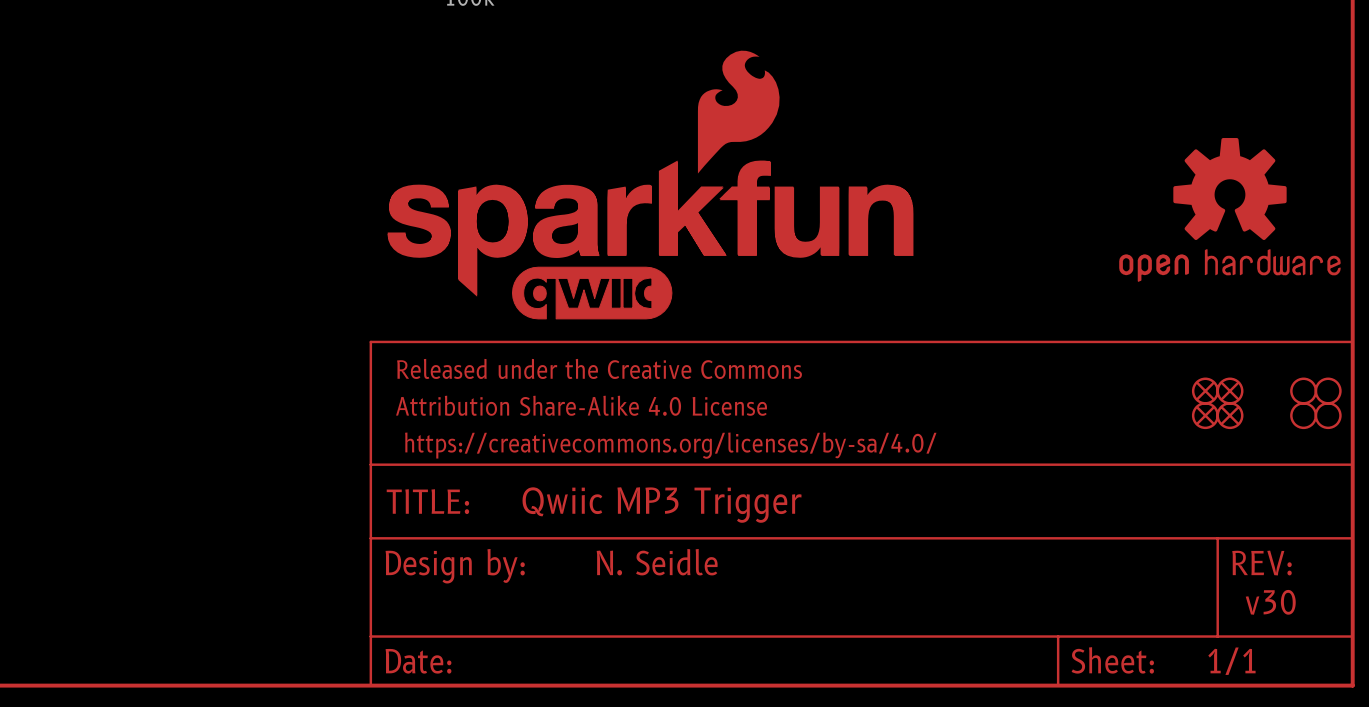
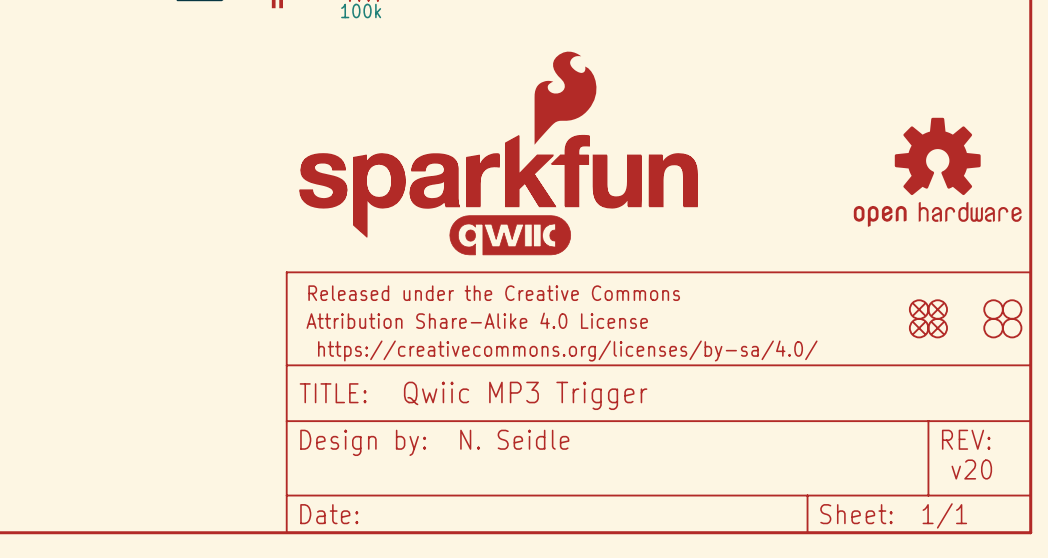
part position: (592, 293) -> (510, 235)
text: v30 (1270, 602) -> v20 (971, 469)

